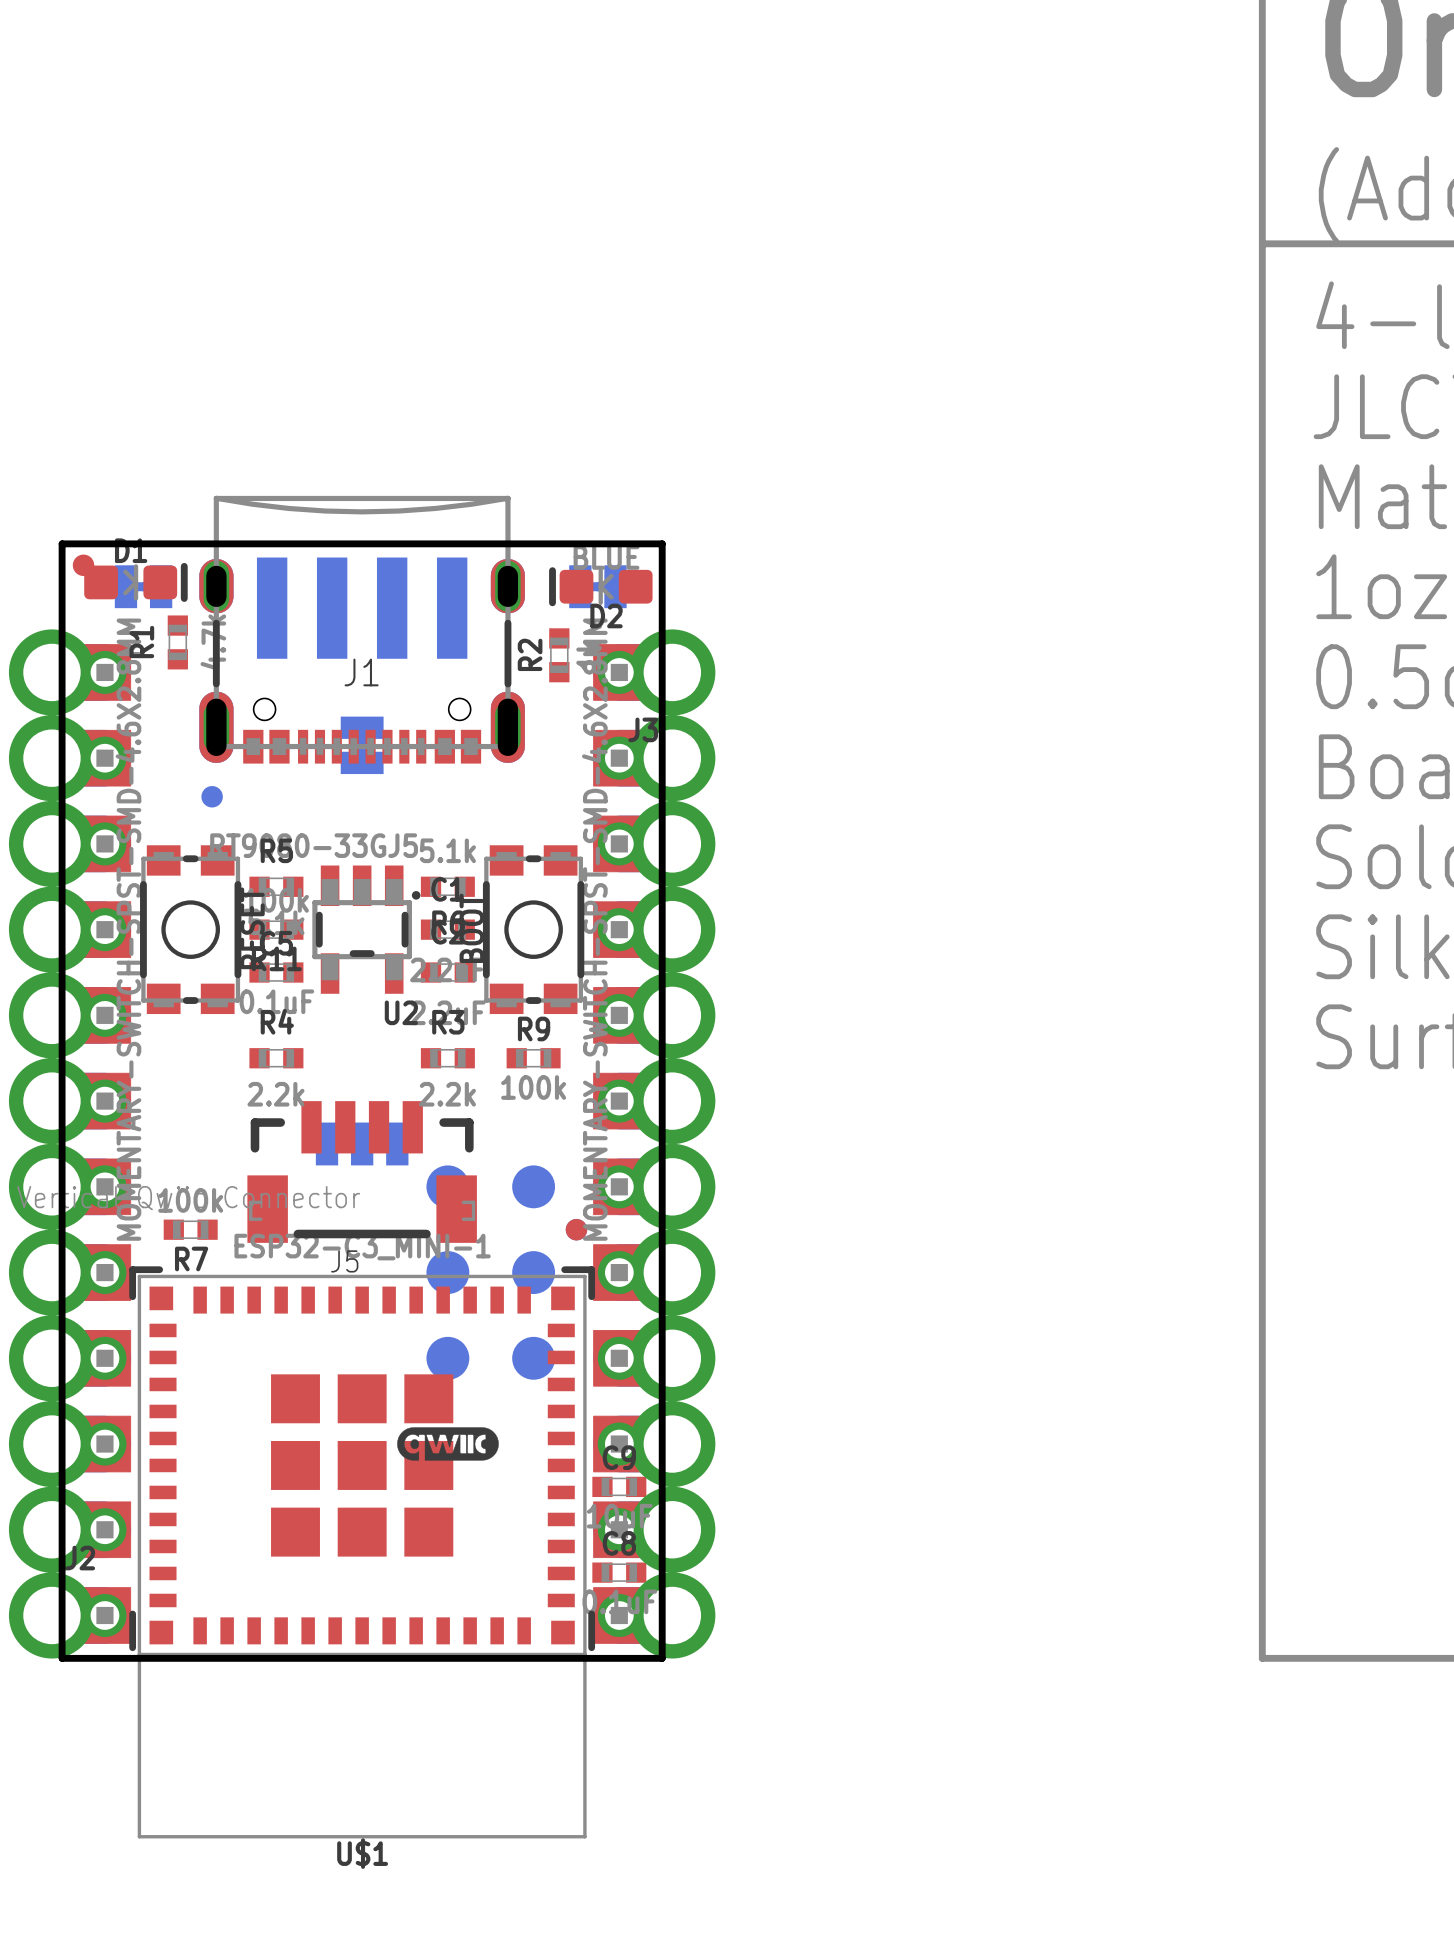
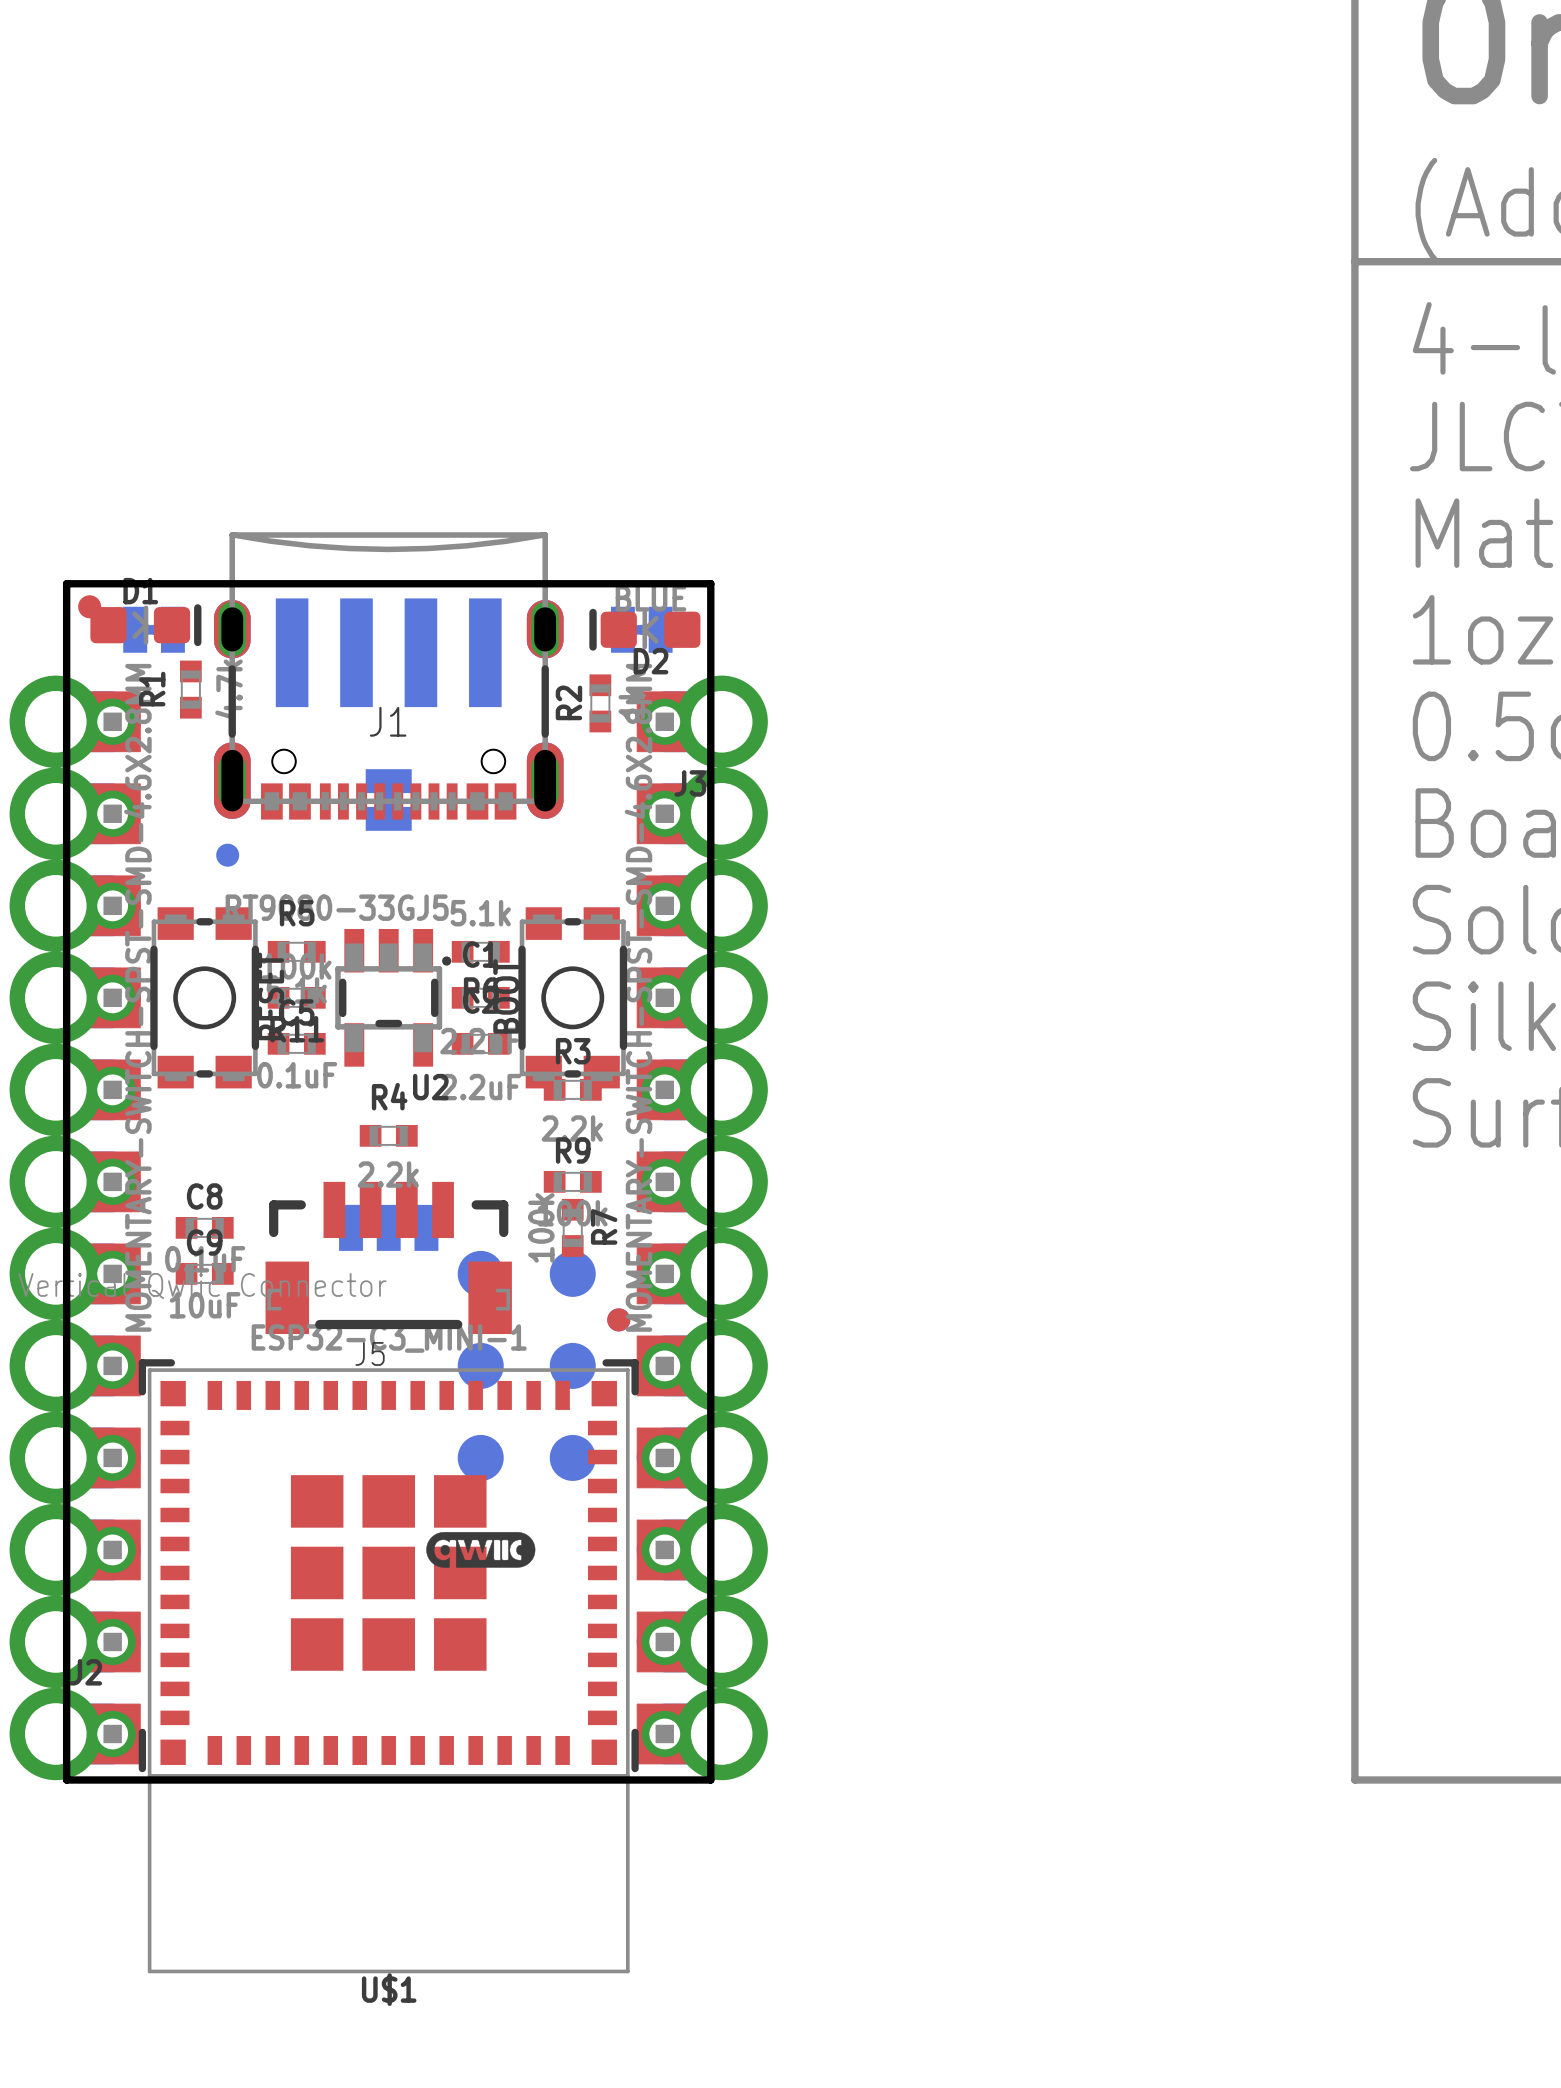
R4 position: (276, 1058) -> (388, 1135)
R3 position: (447, 1058) -> (572, 1089)
R9 position: (533, 1058) -> (572, 1181)
R7 rotation: 0° (190, 1229) -> 90° clockwise (572, 1227)
R7 position: (190, 1229) -> (572, 1227)
C9 position: (619, 1486) -> (204, 1273)
C8 position: (619, 1572) -> (204, 1227)

